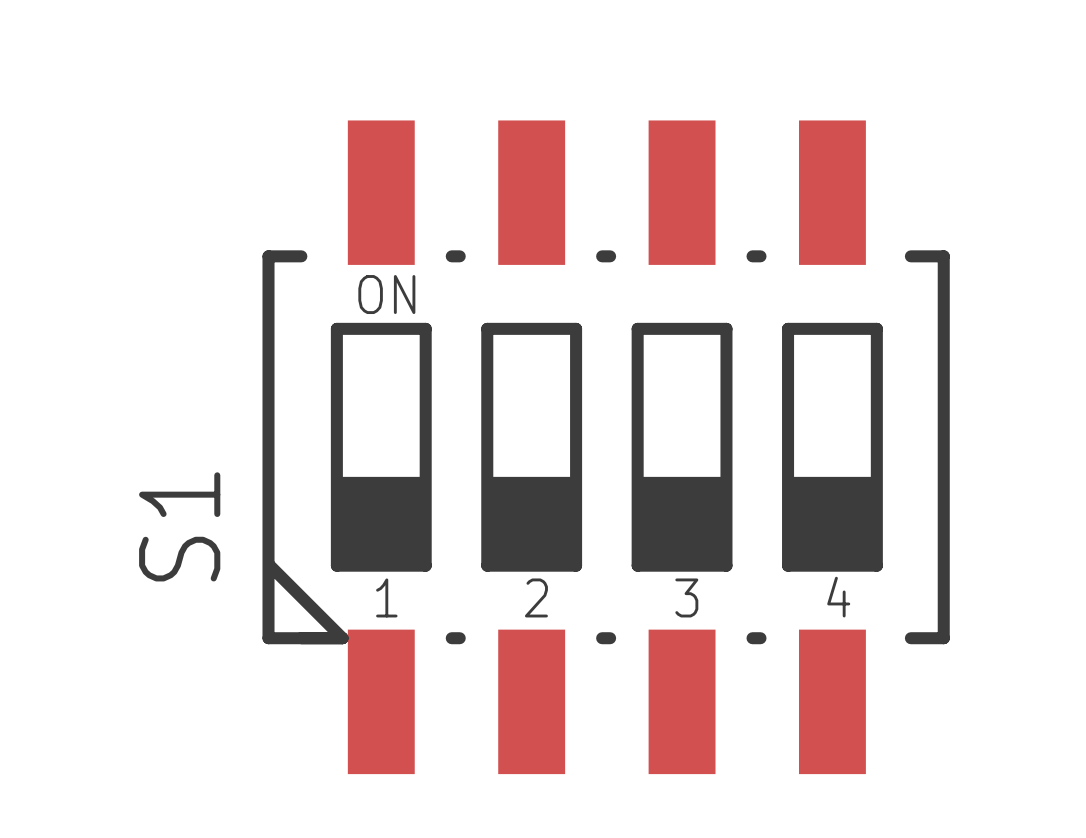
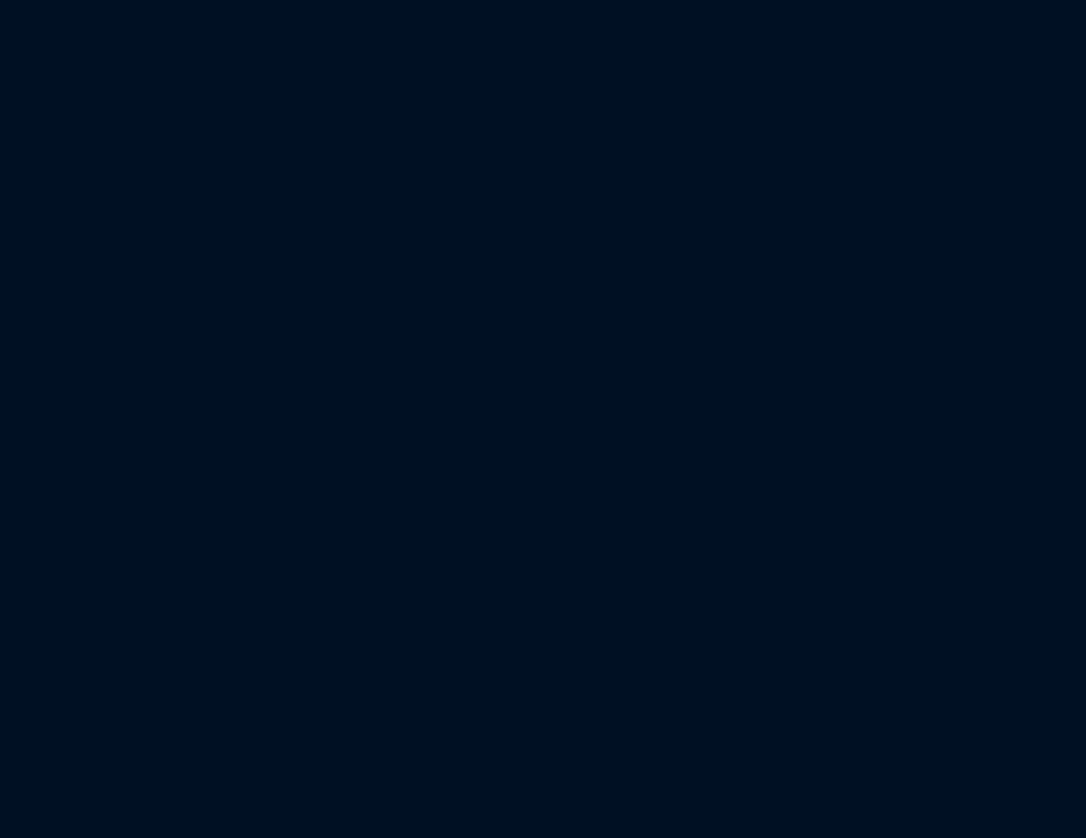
S1: (606, 447) -> none

